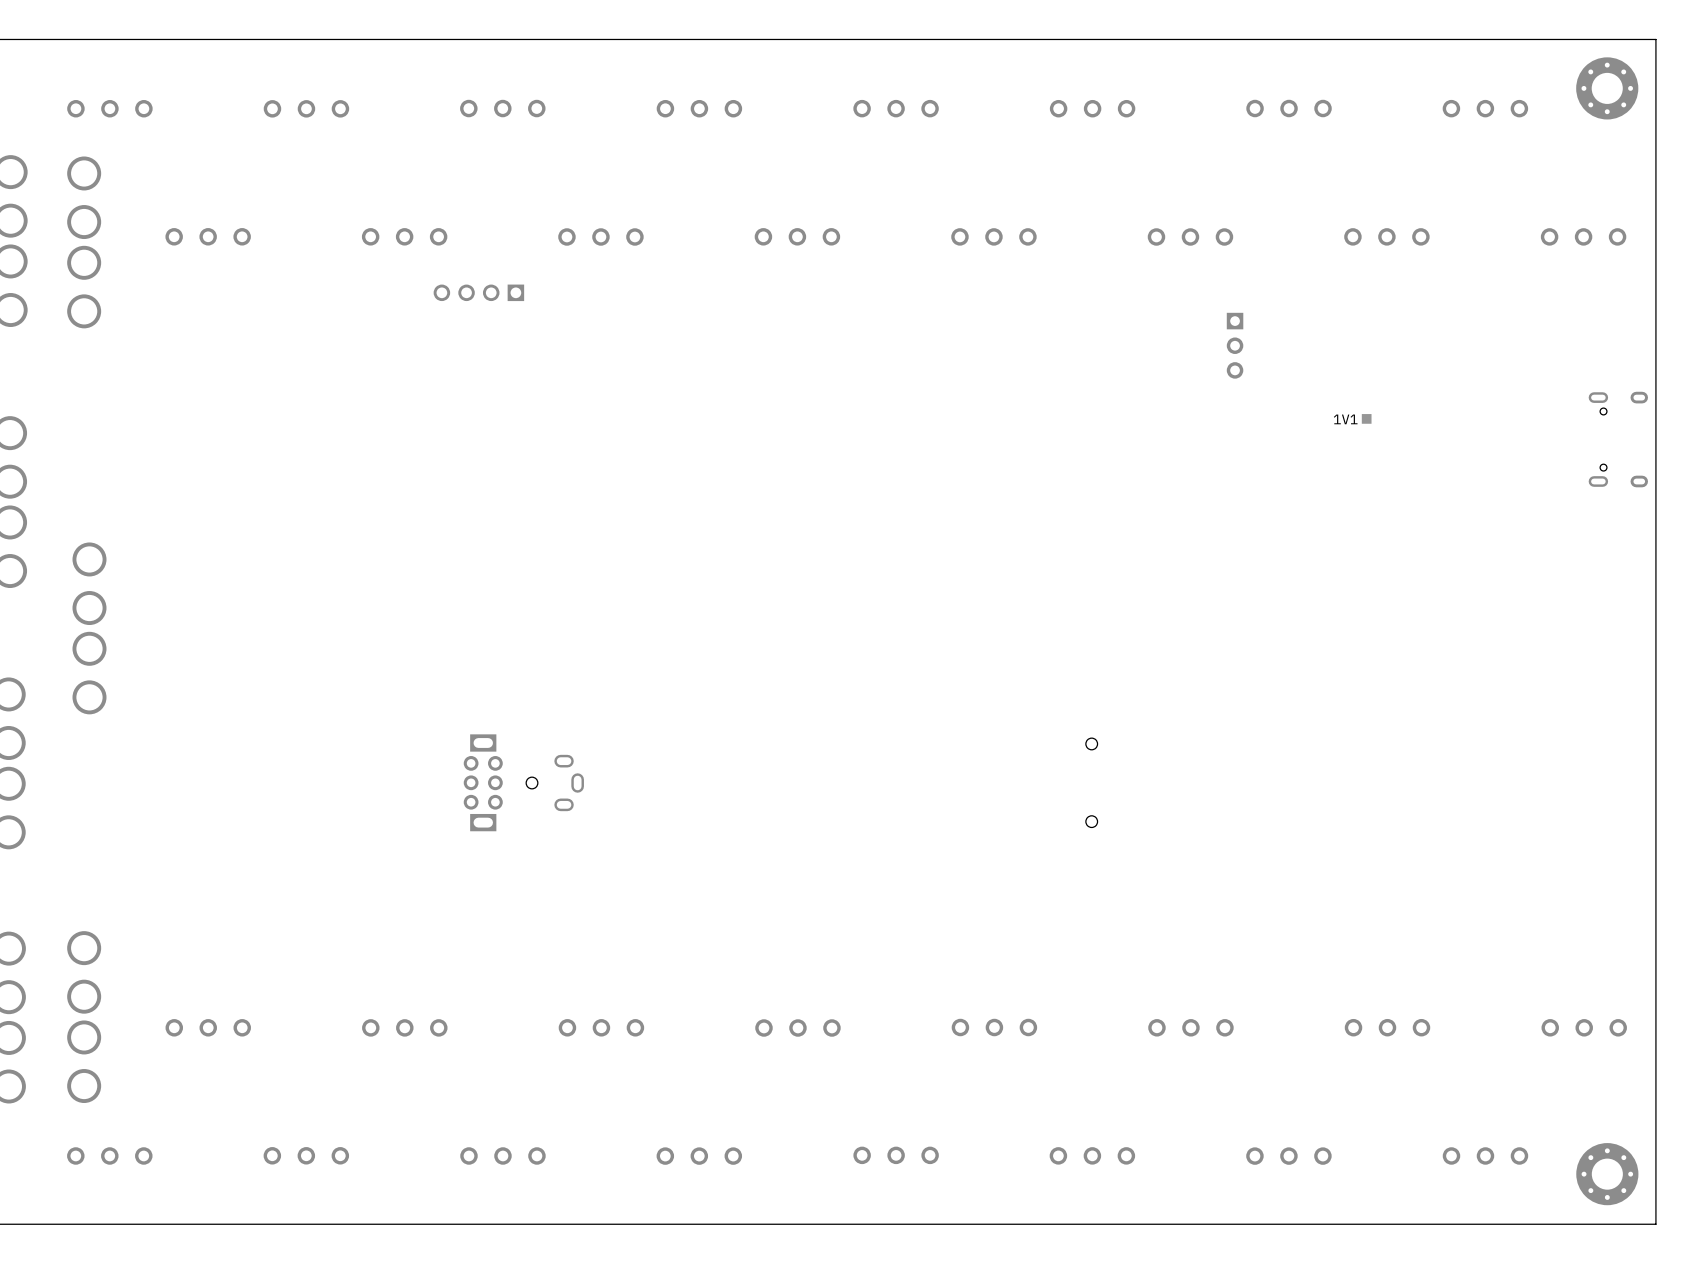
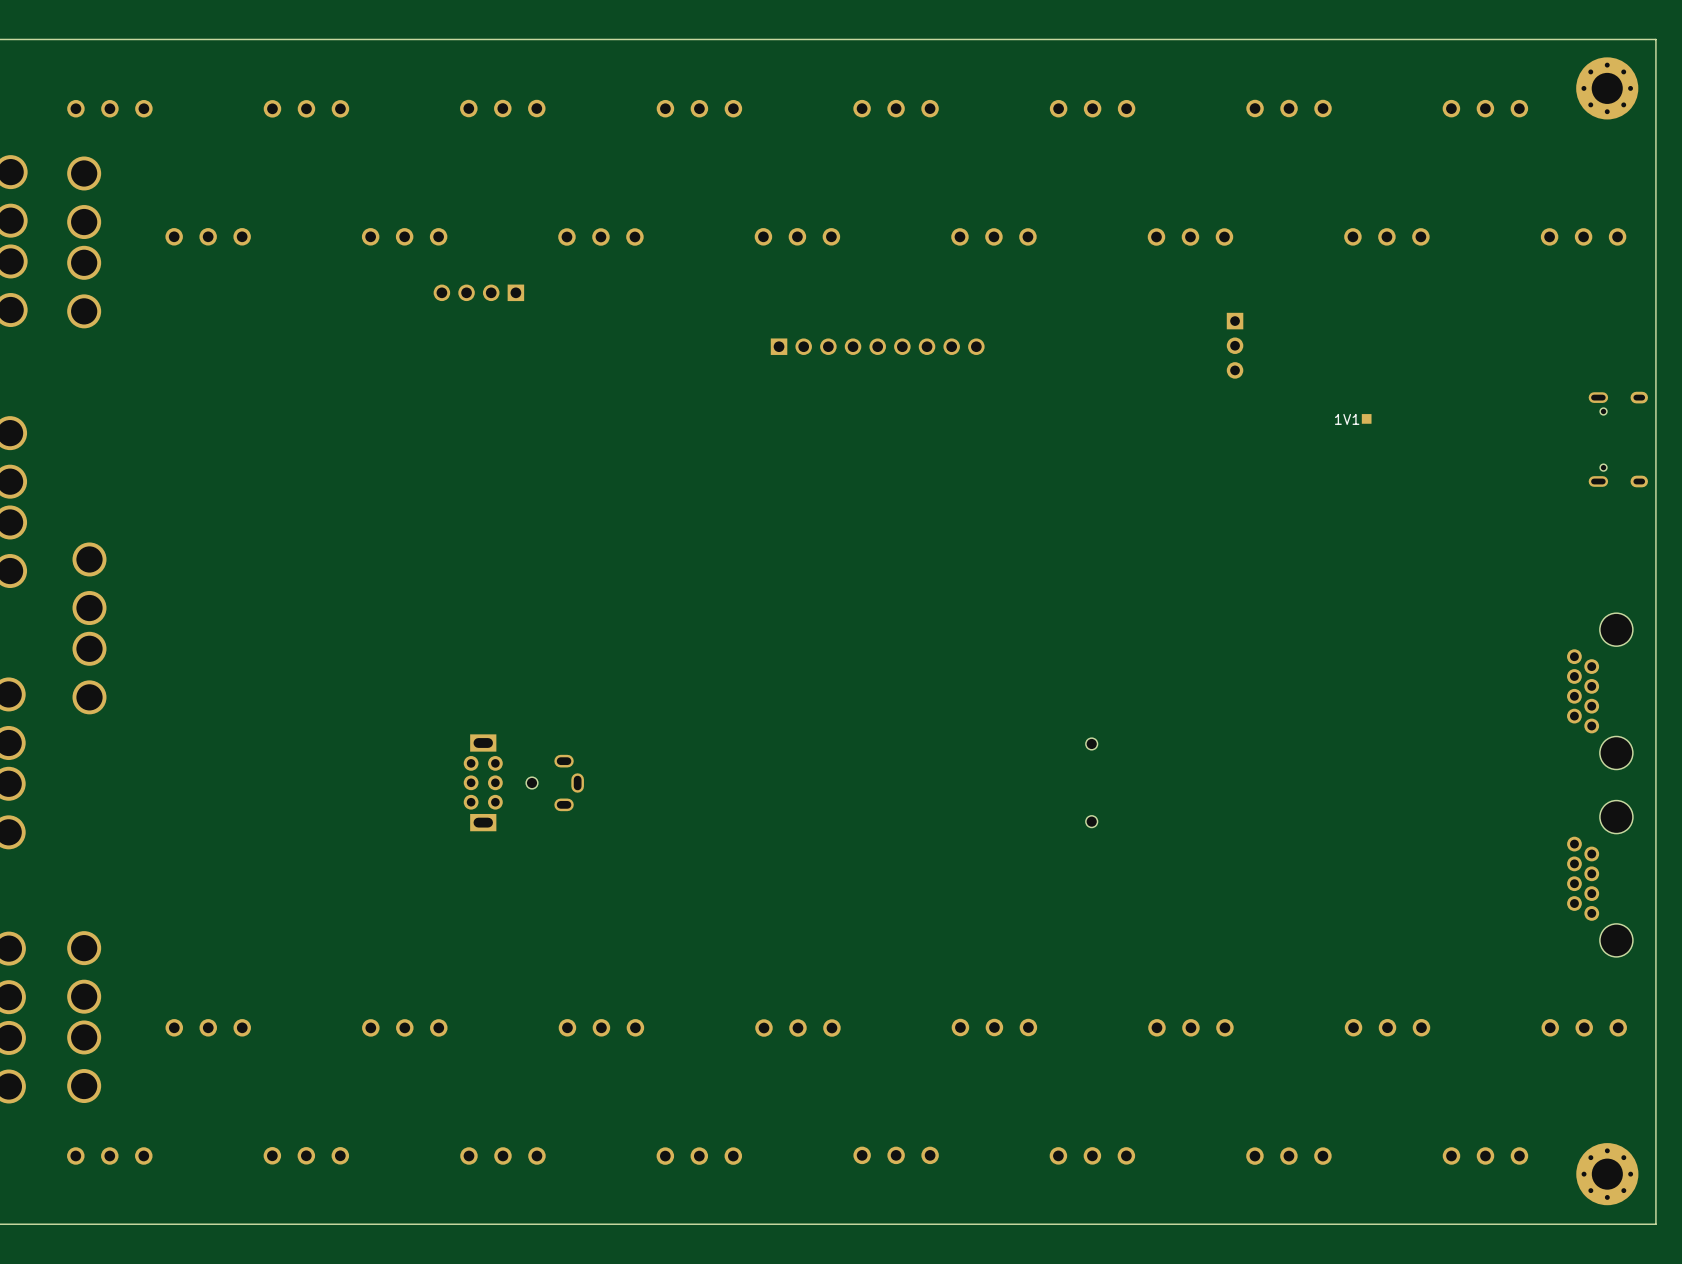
part: none -> (877, 346)
part: none -> (1599, 691)
part: none -> (1600, 878)

